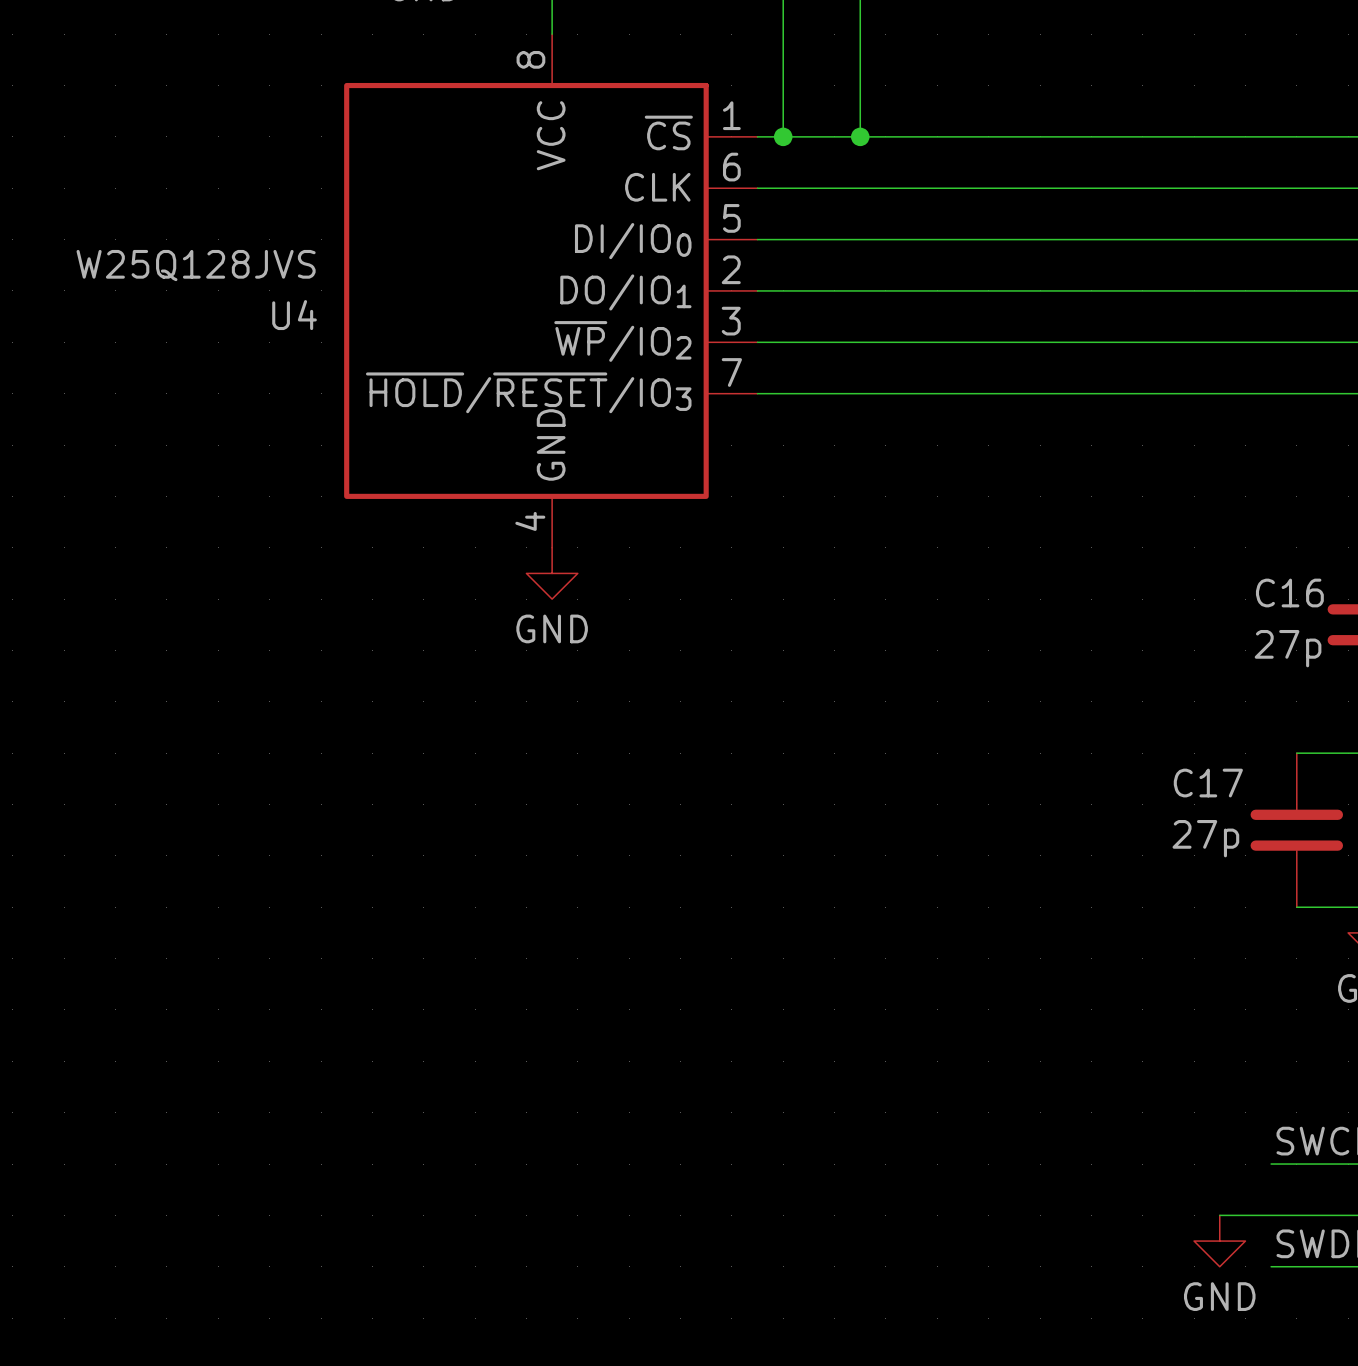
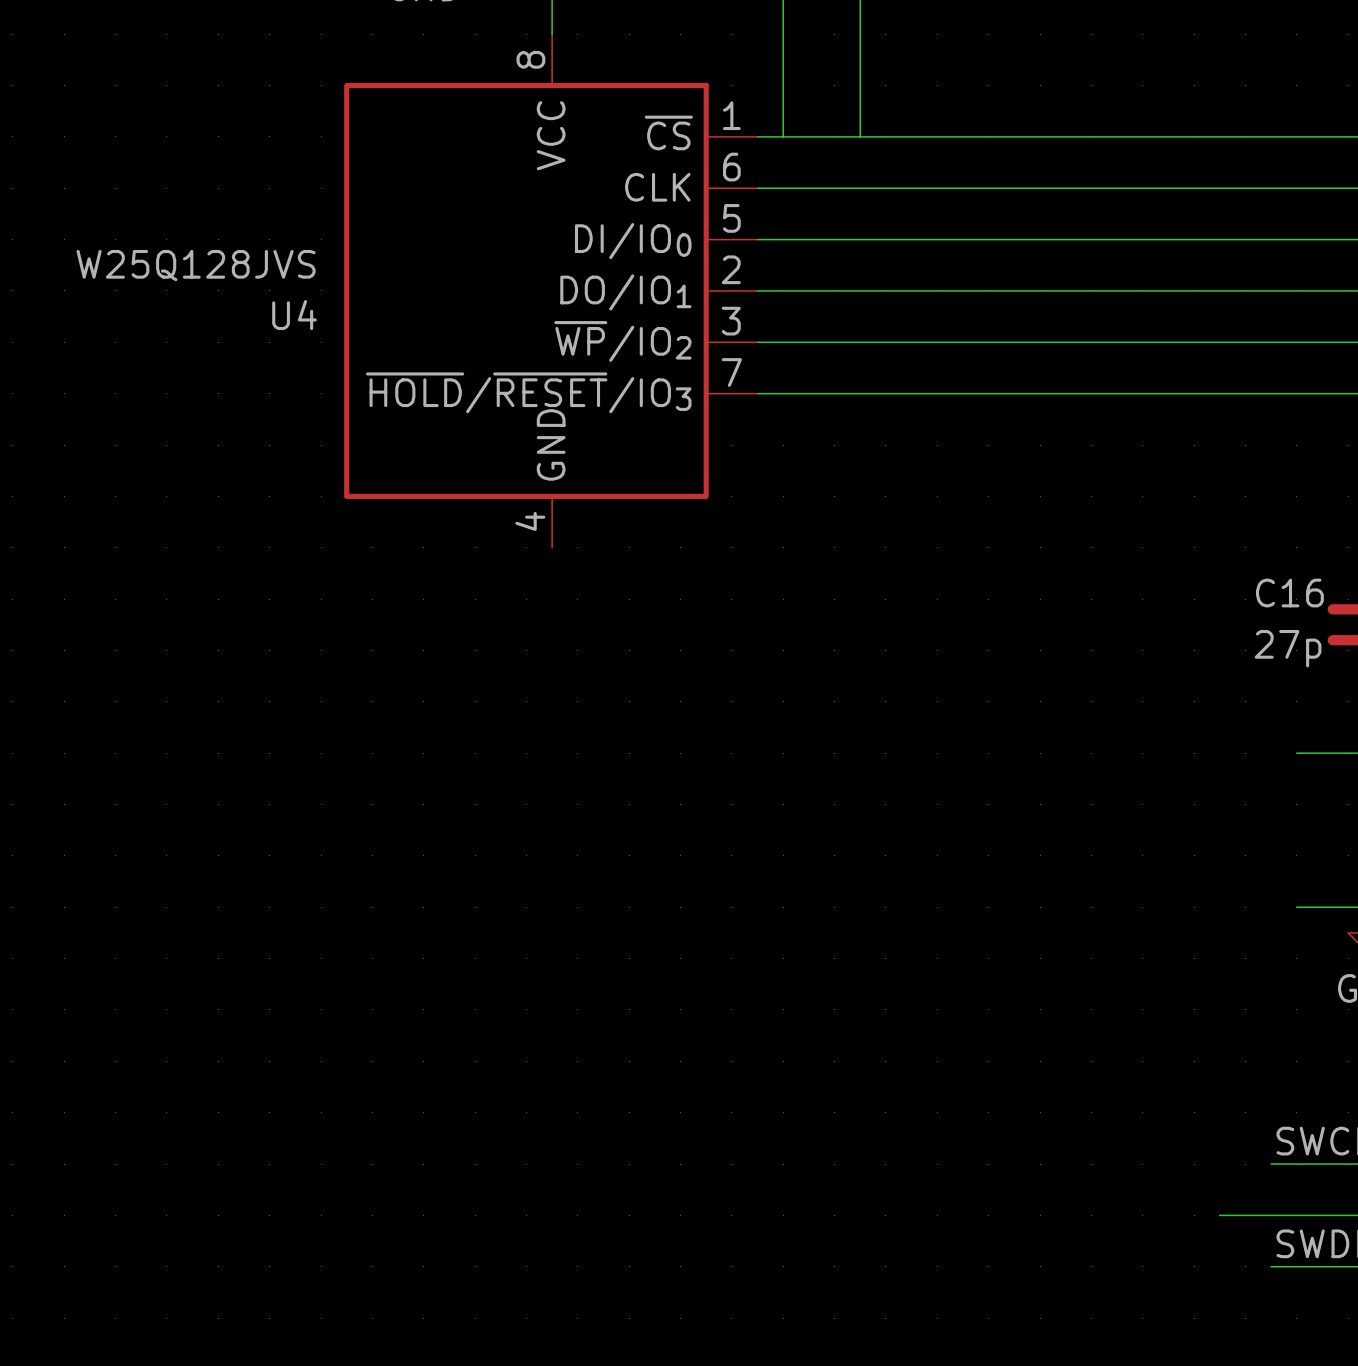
junction: (783, 136) -> none
junction: (860, 136) -> none
power symbol: GND (552, 573) -> none
C17: 27p (1296, 830) -> none
power symbol: GND (1219, 1241) -> none

